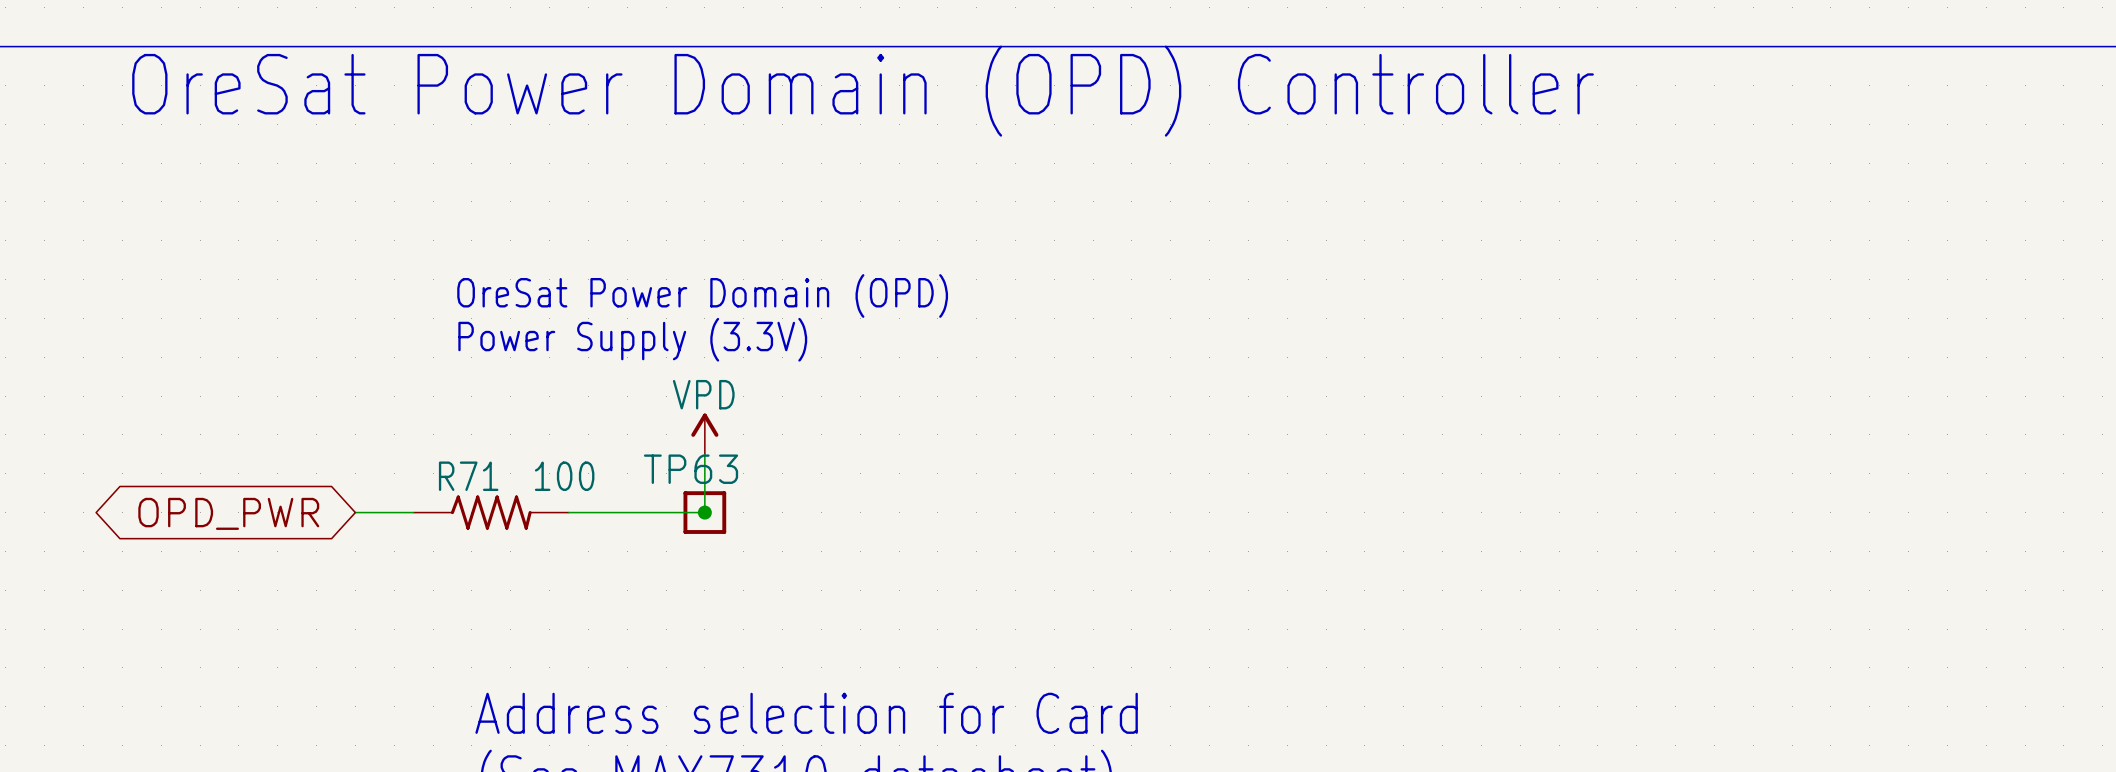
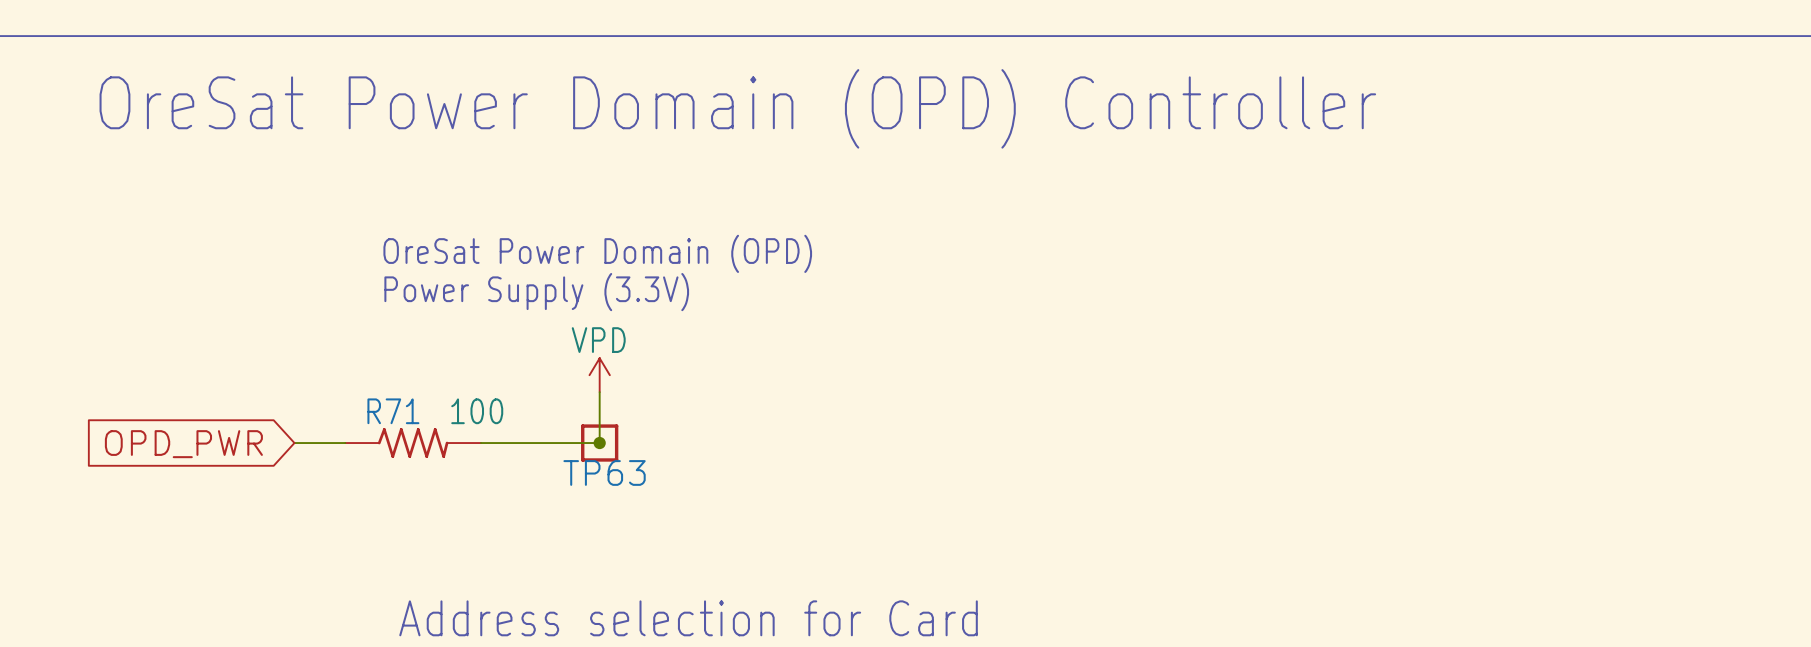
text position: OreSat Power Domain (OPD) Controller (863, 91) -> OreSat Power Domain (OPD) Controller (737, 108)
power symbol shape: [691, 413, 719, 455] -> [589, 358, 610, 393]
TP63 name position: TP63 (691, 469) -> TP63 (604, 472)
global label shape: bidirectional (228, 513) -> input (183, 444)

